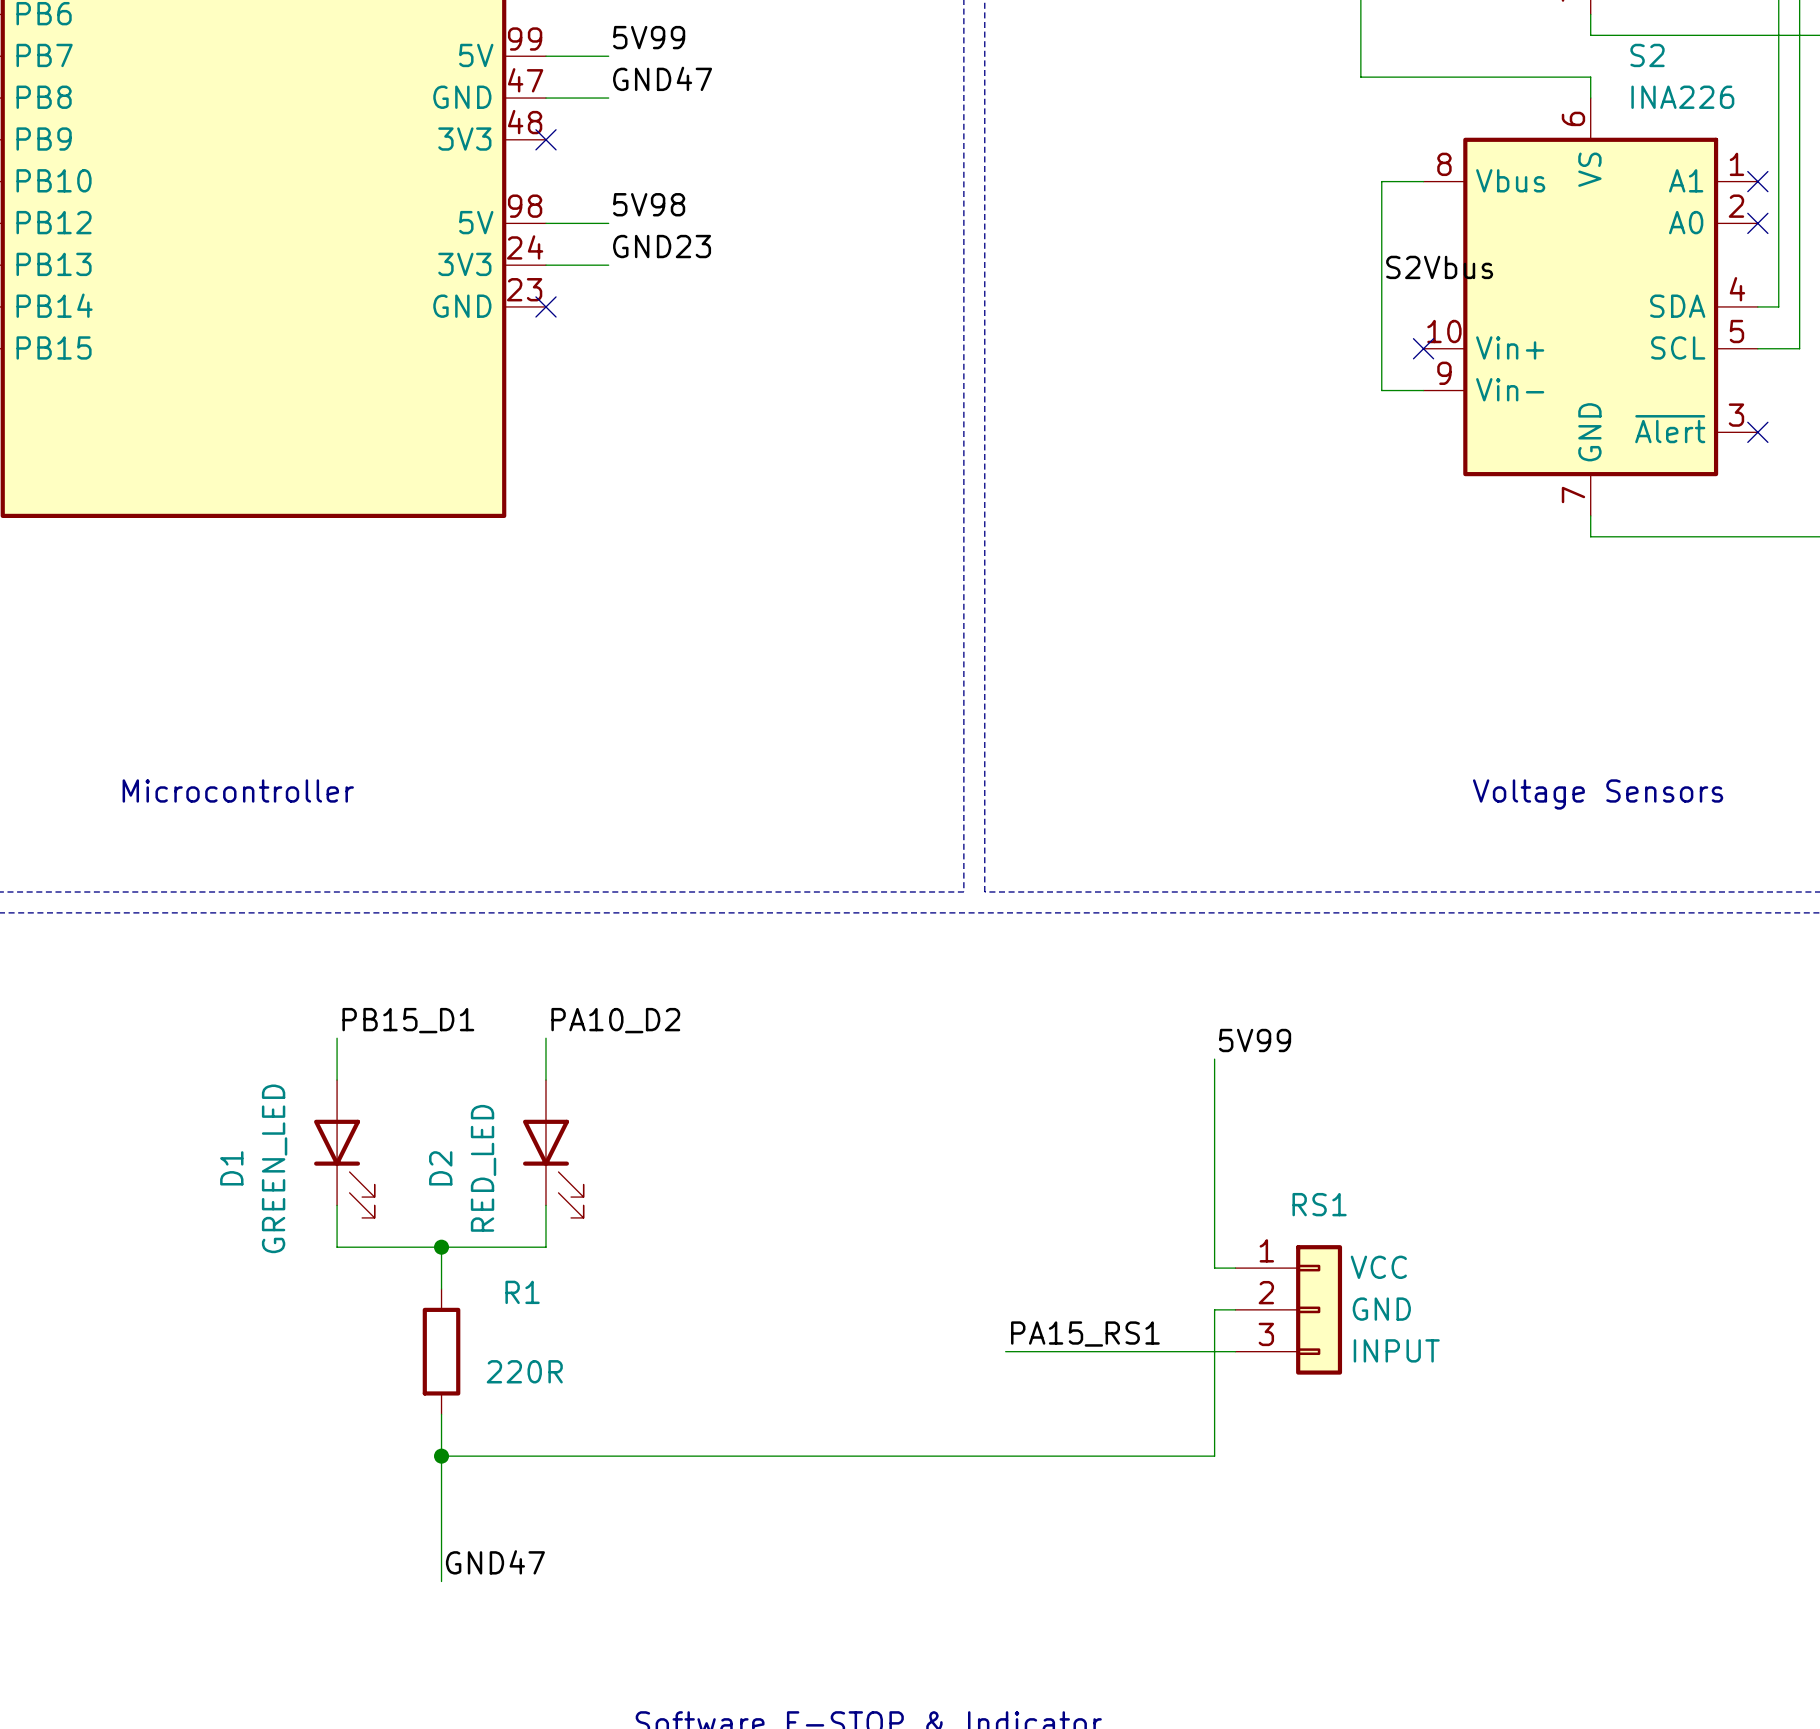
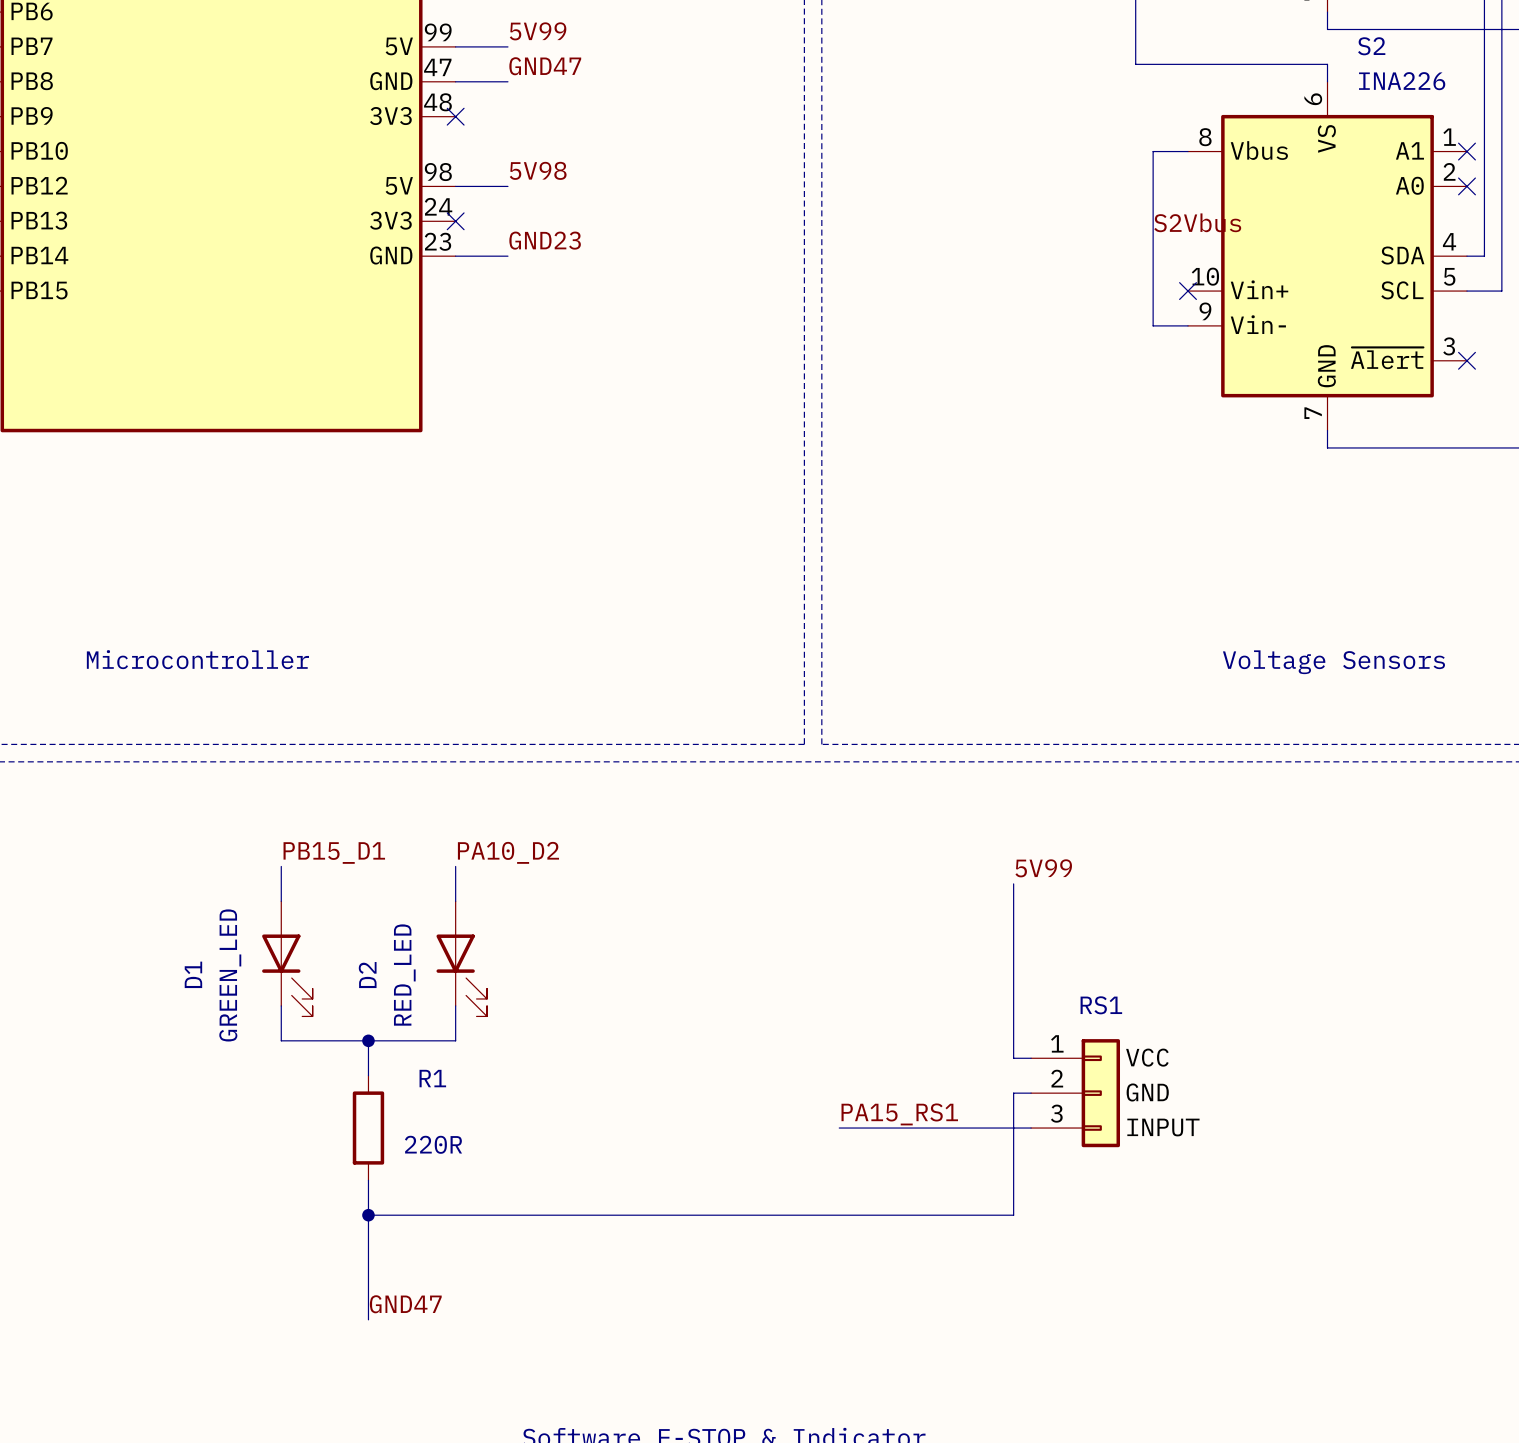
label position: GND23 (662, 246) -> GND23 (545, 240)
wire: (545, 265) (608, 265) -> (455, 256) (507, 256)
no-connect mark position: (545, 306) -> (455, 221)

